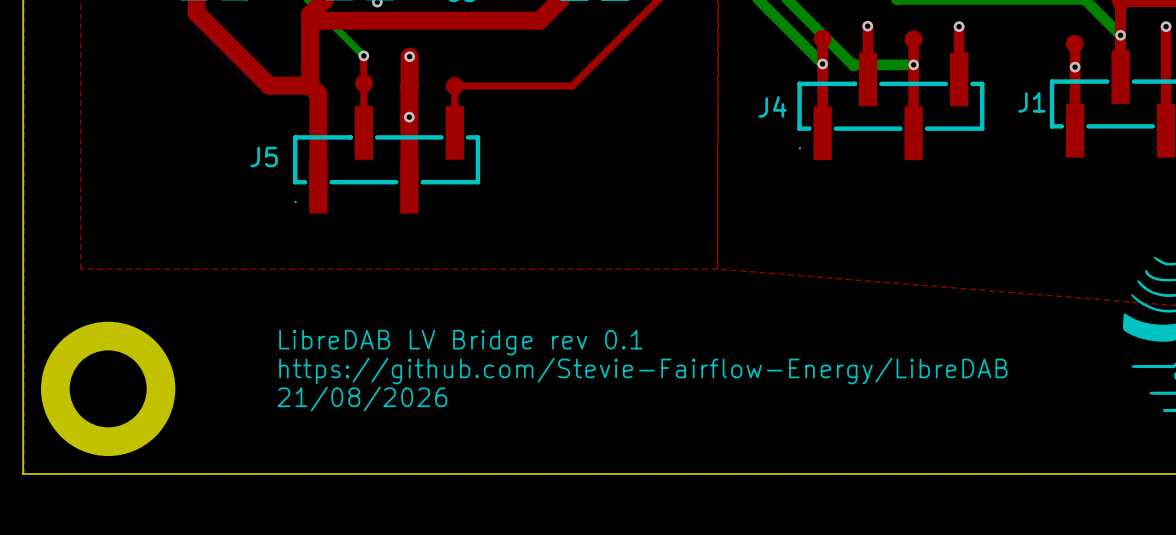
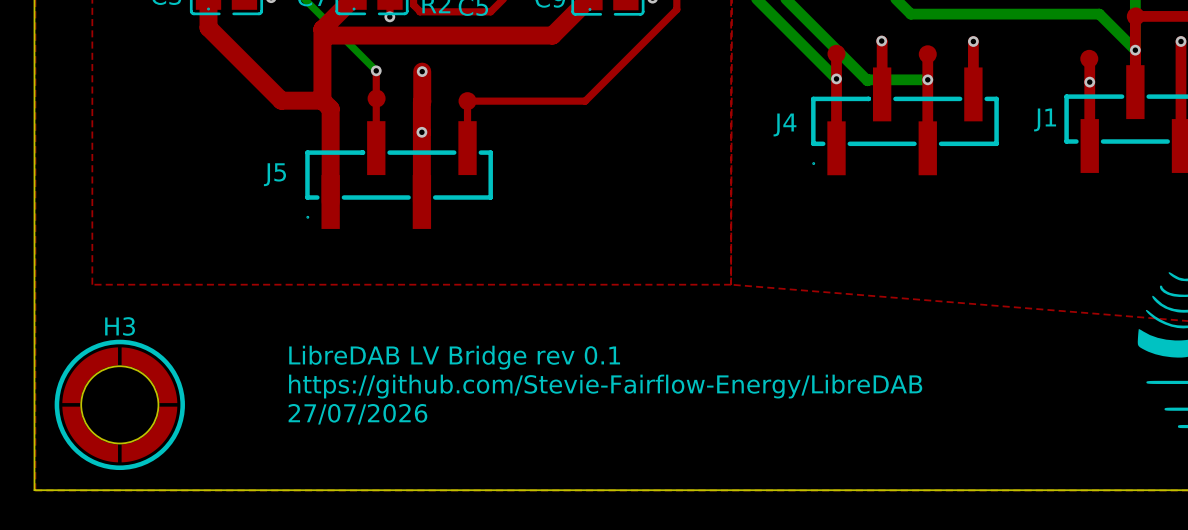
part: (108, 388) -> none
H3: none -> (119, 404)
text: 21/08/2026 (362, 398) -> 27/07/2026 (357, 414)

